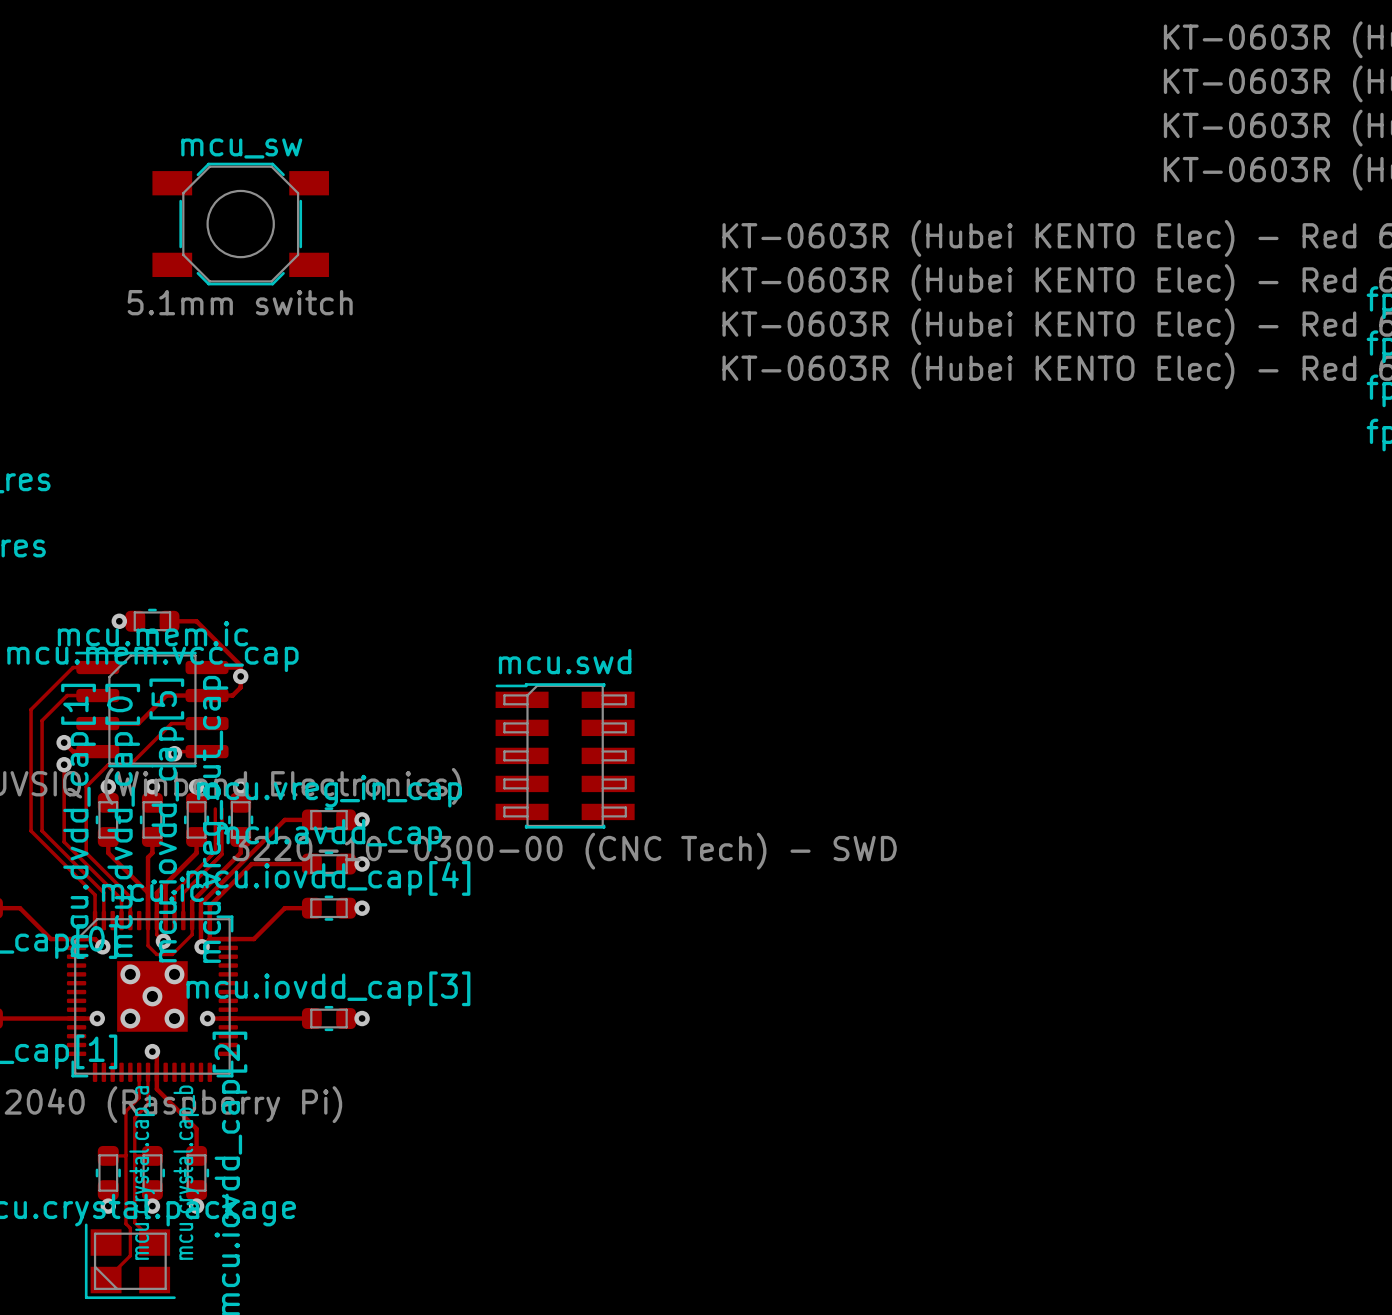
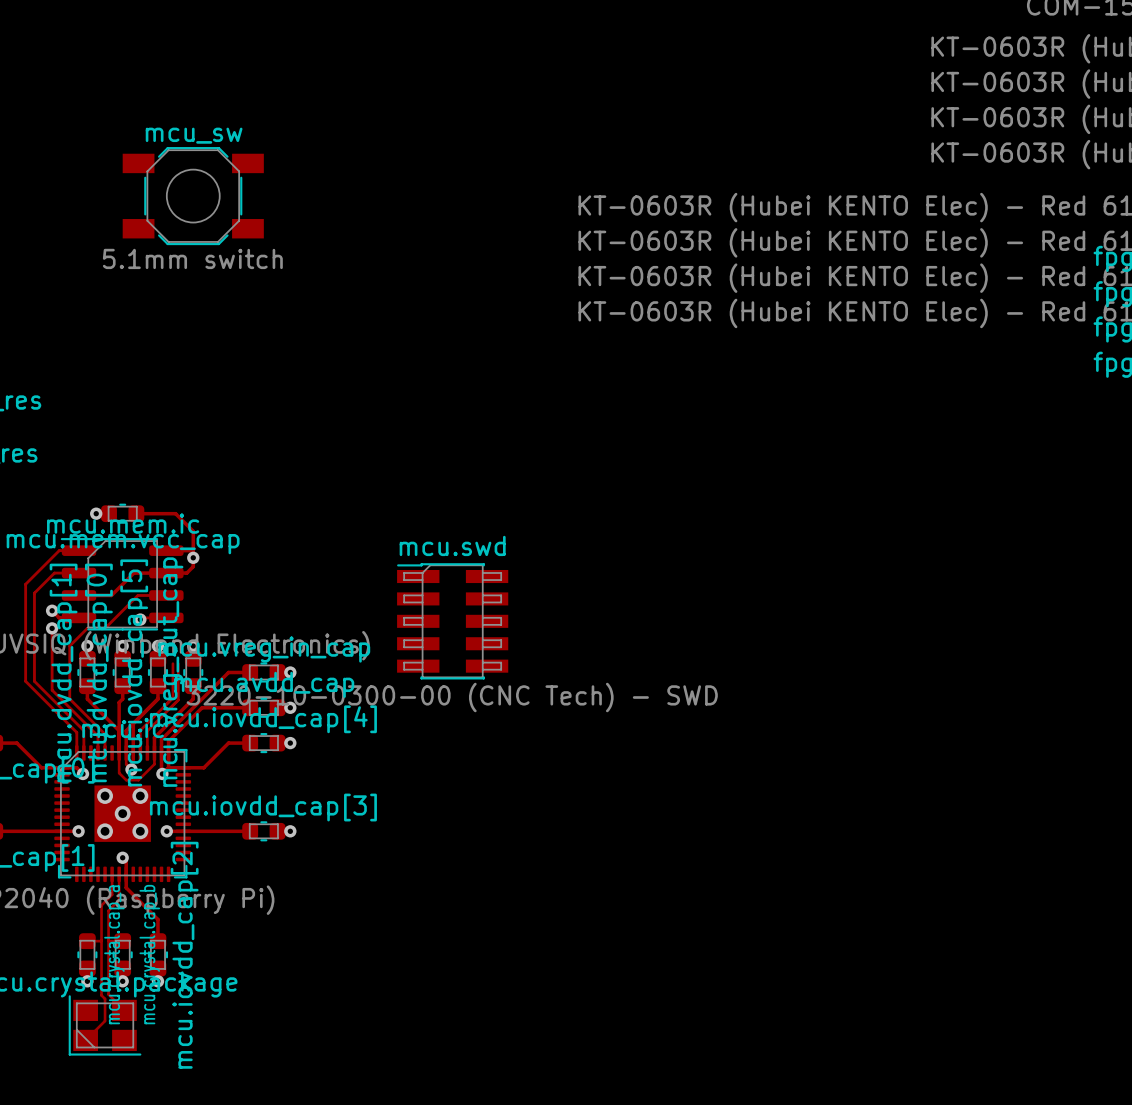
track: (196, 621) (240, 665) -> (157, 513) (175, 513) (193, 531) (193, 548)

